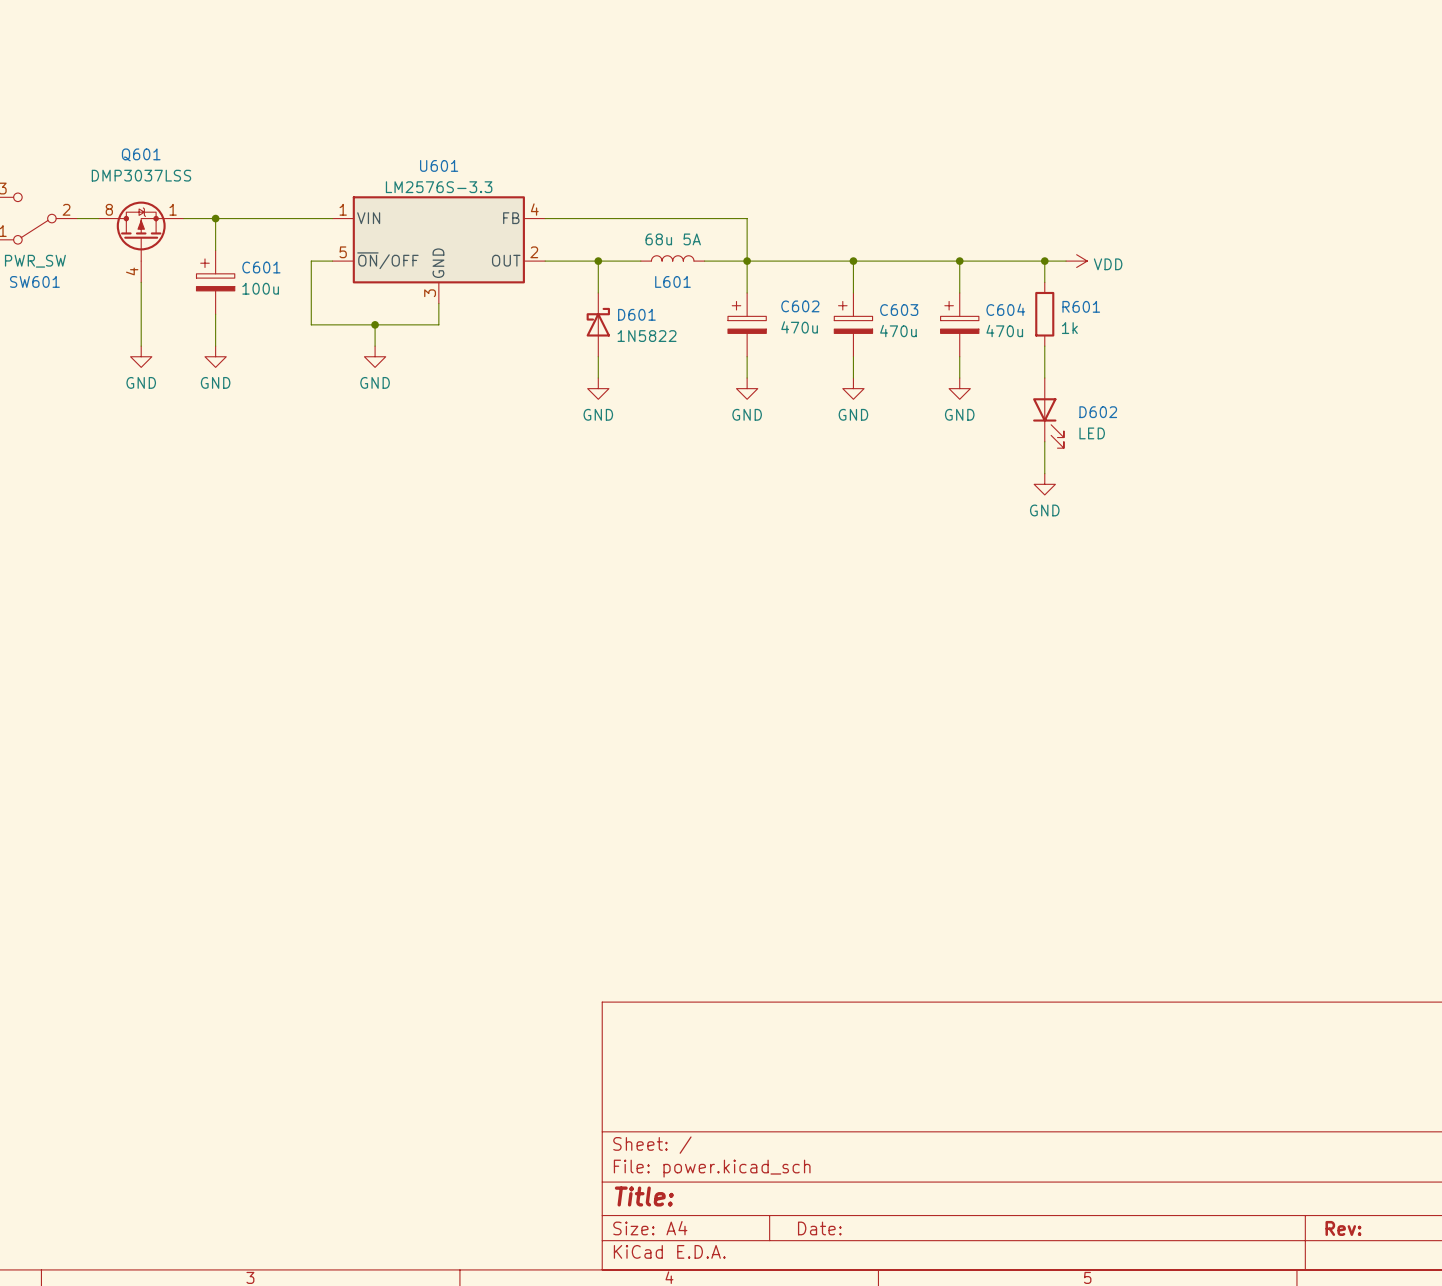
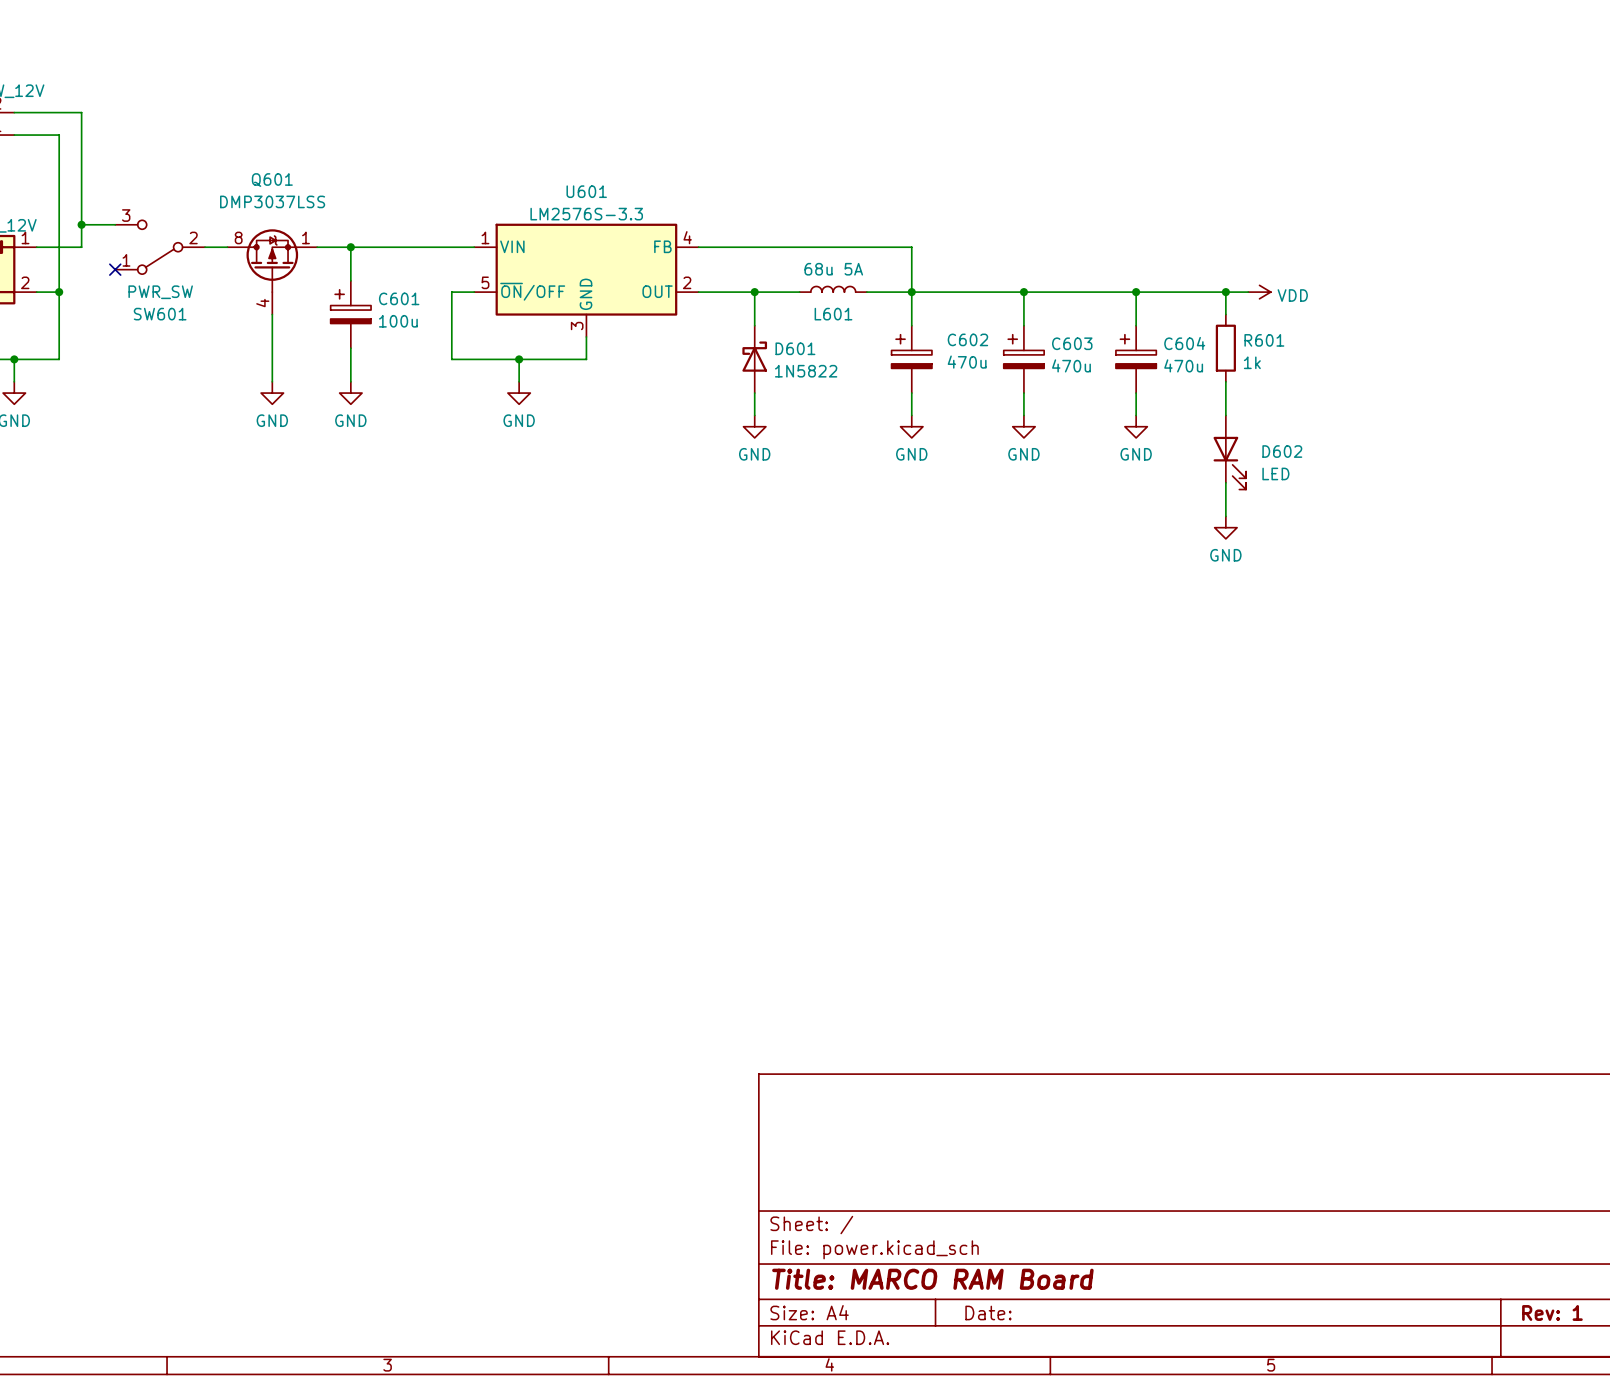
title block: Title: (644, 1196) -> Title: MARCO RAM Board (932, 1279)
title block: Rev: (1343, 1228) -> Rev: 1 (1552, 1312)

